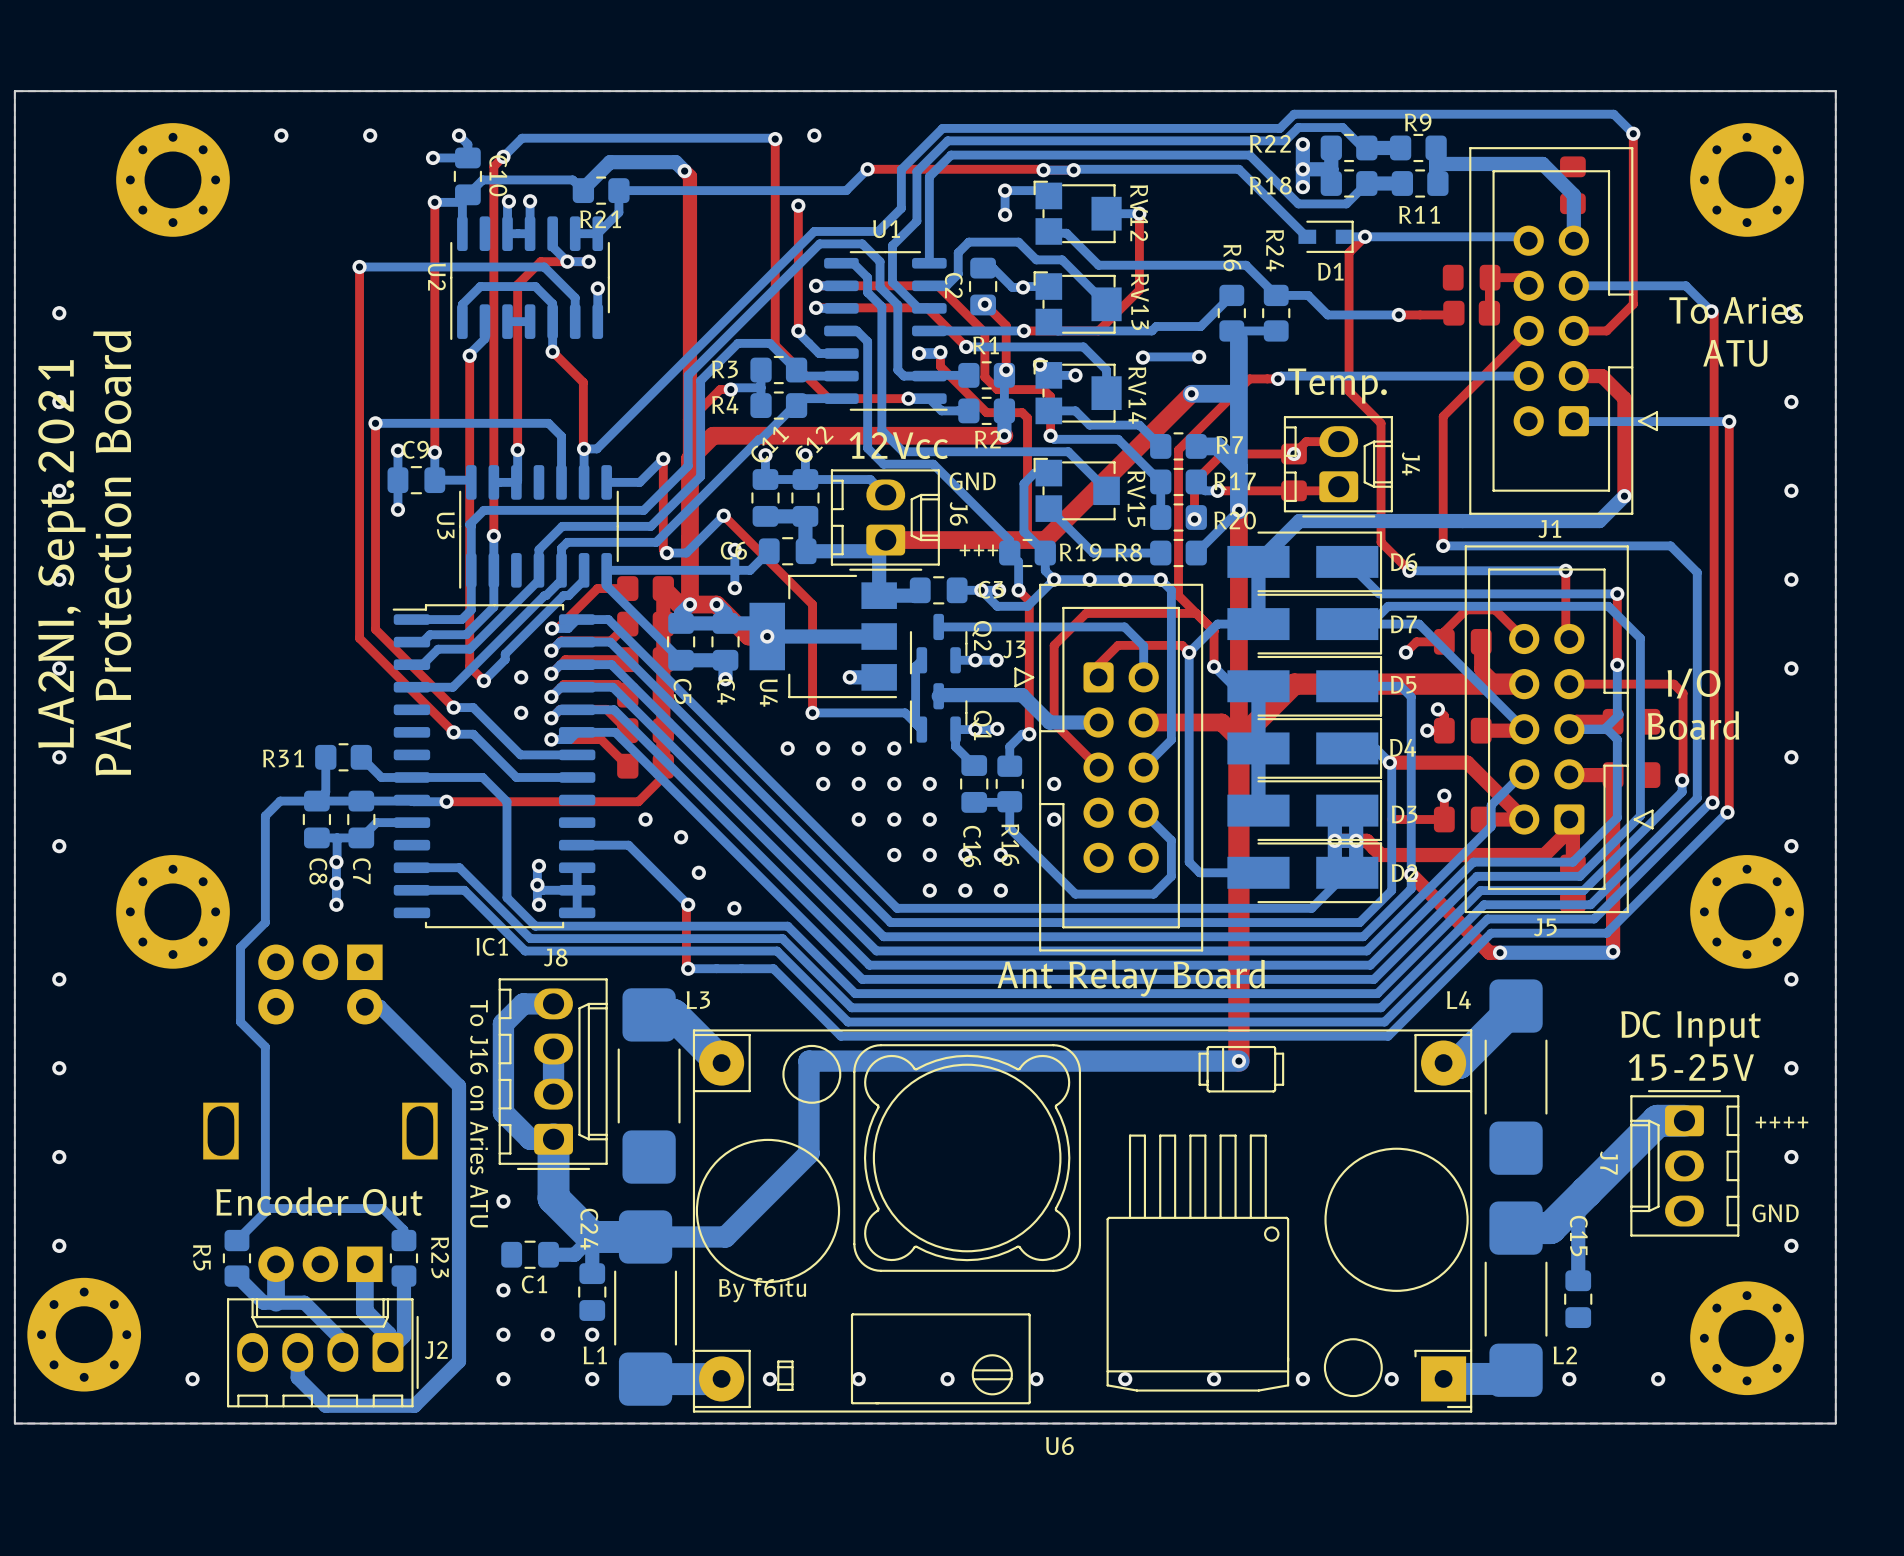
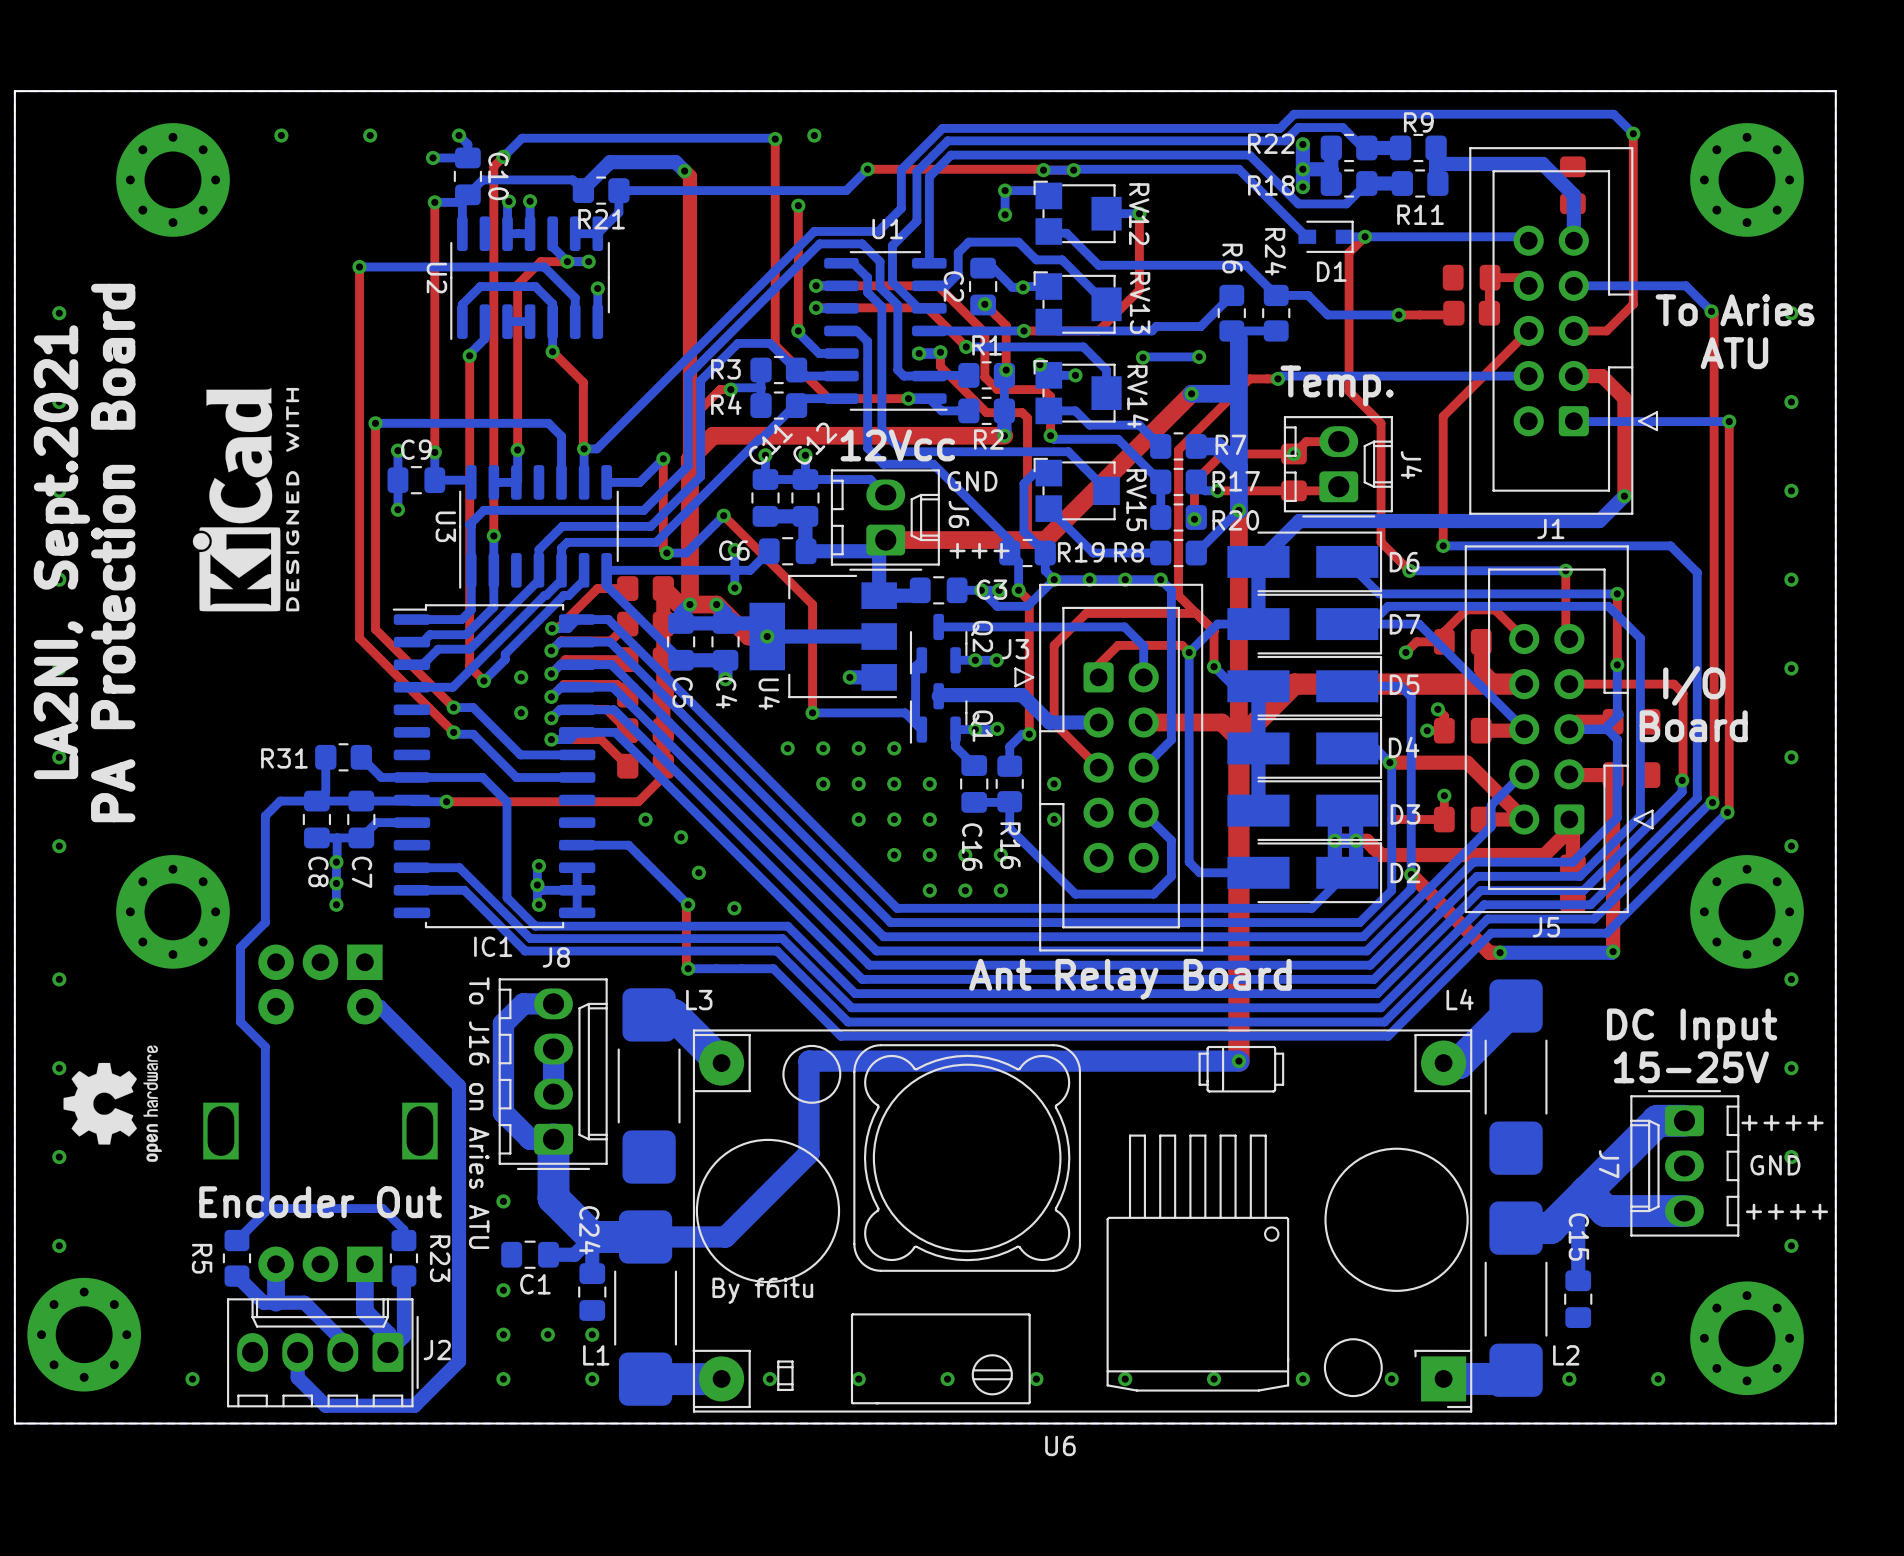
drawing: none -> [192, 387, 300, 612]
drawing: none -> [63, 1045, 162, 1162]
text: none -> GND (1775, 1165)
bottom track: none -> (1586, 1191) (1605, 1211) (1684, 1211)
text: GND (1775, 1213) -> ++++ (1786, 1211)

